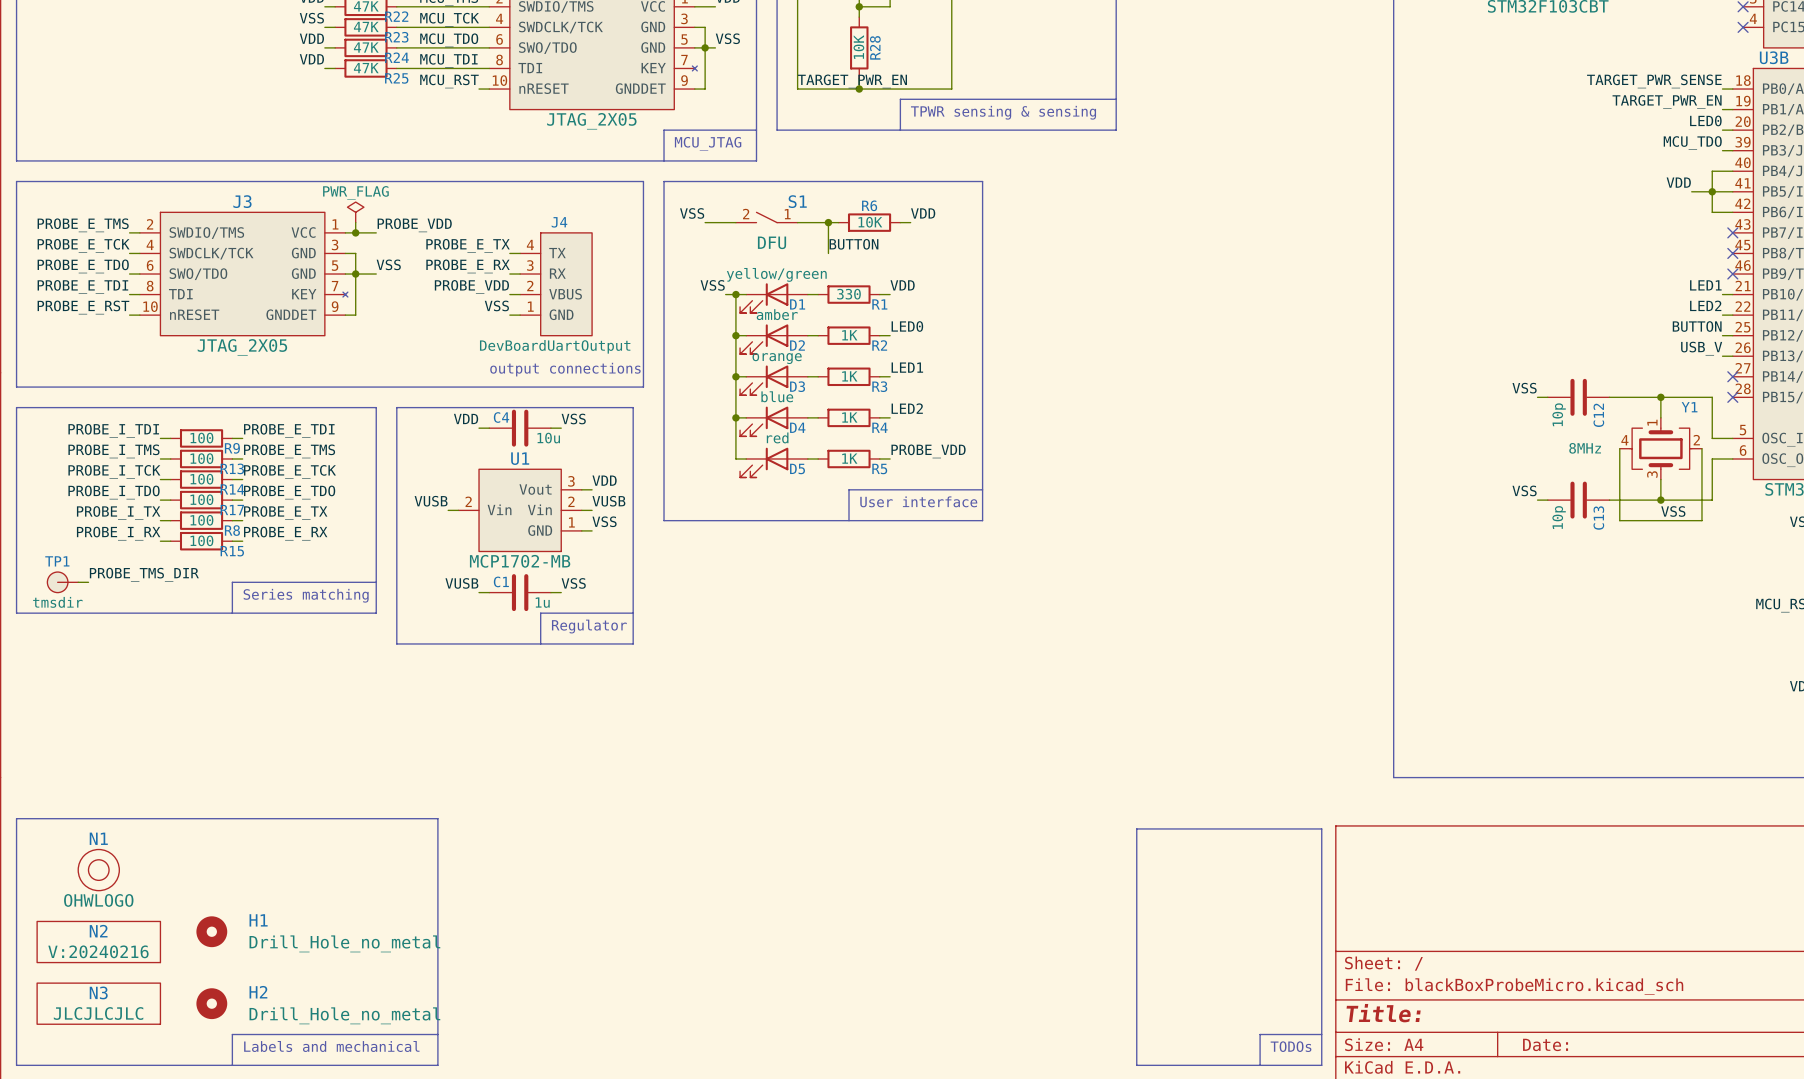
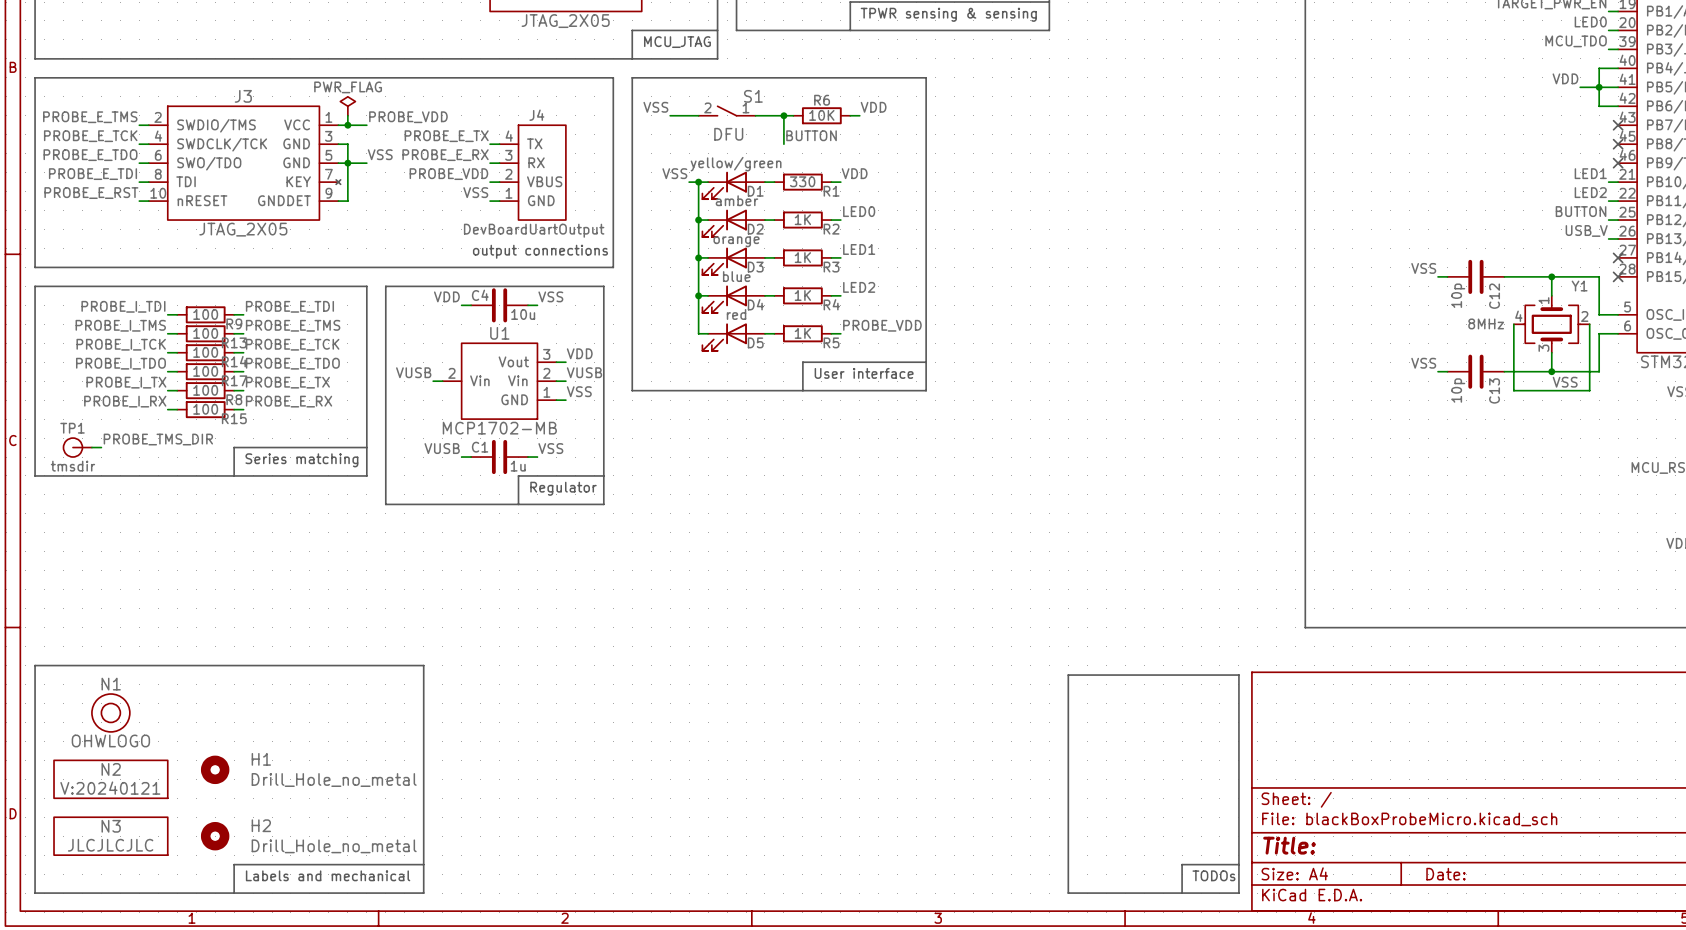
N2 value: V:20240216 (98, 951) -> V:20240121 (110, 788)

